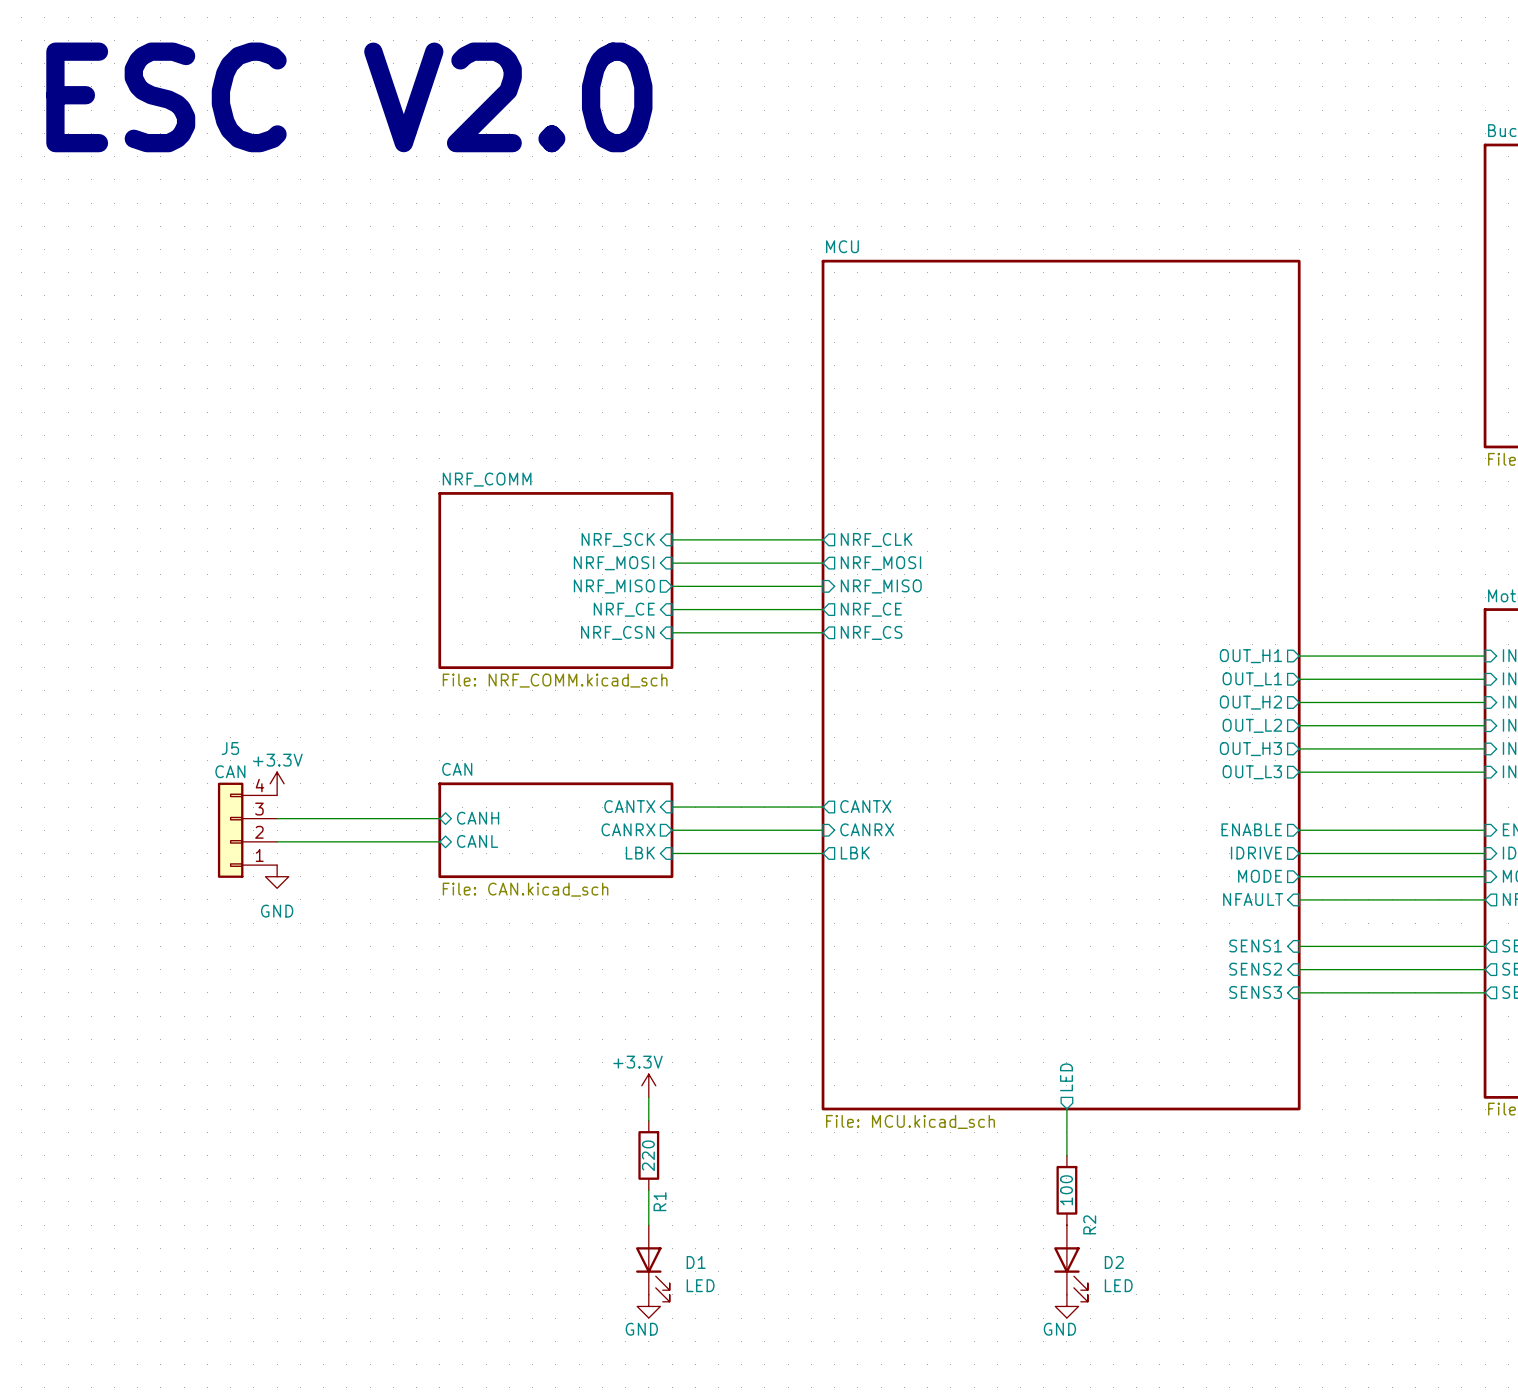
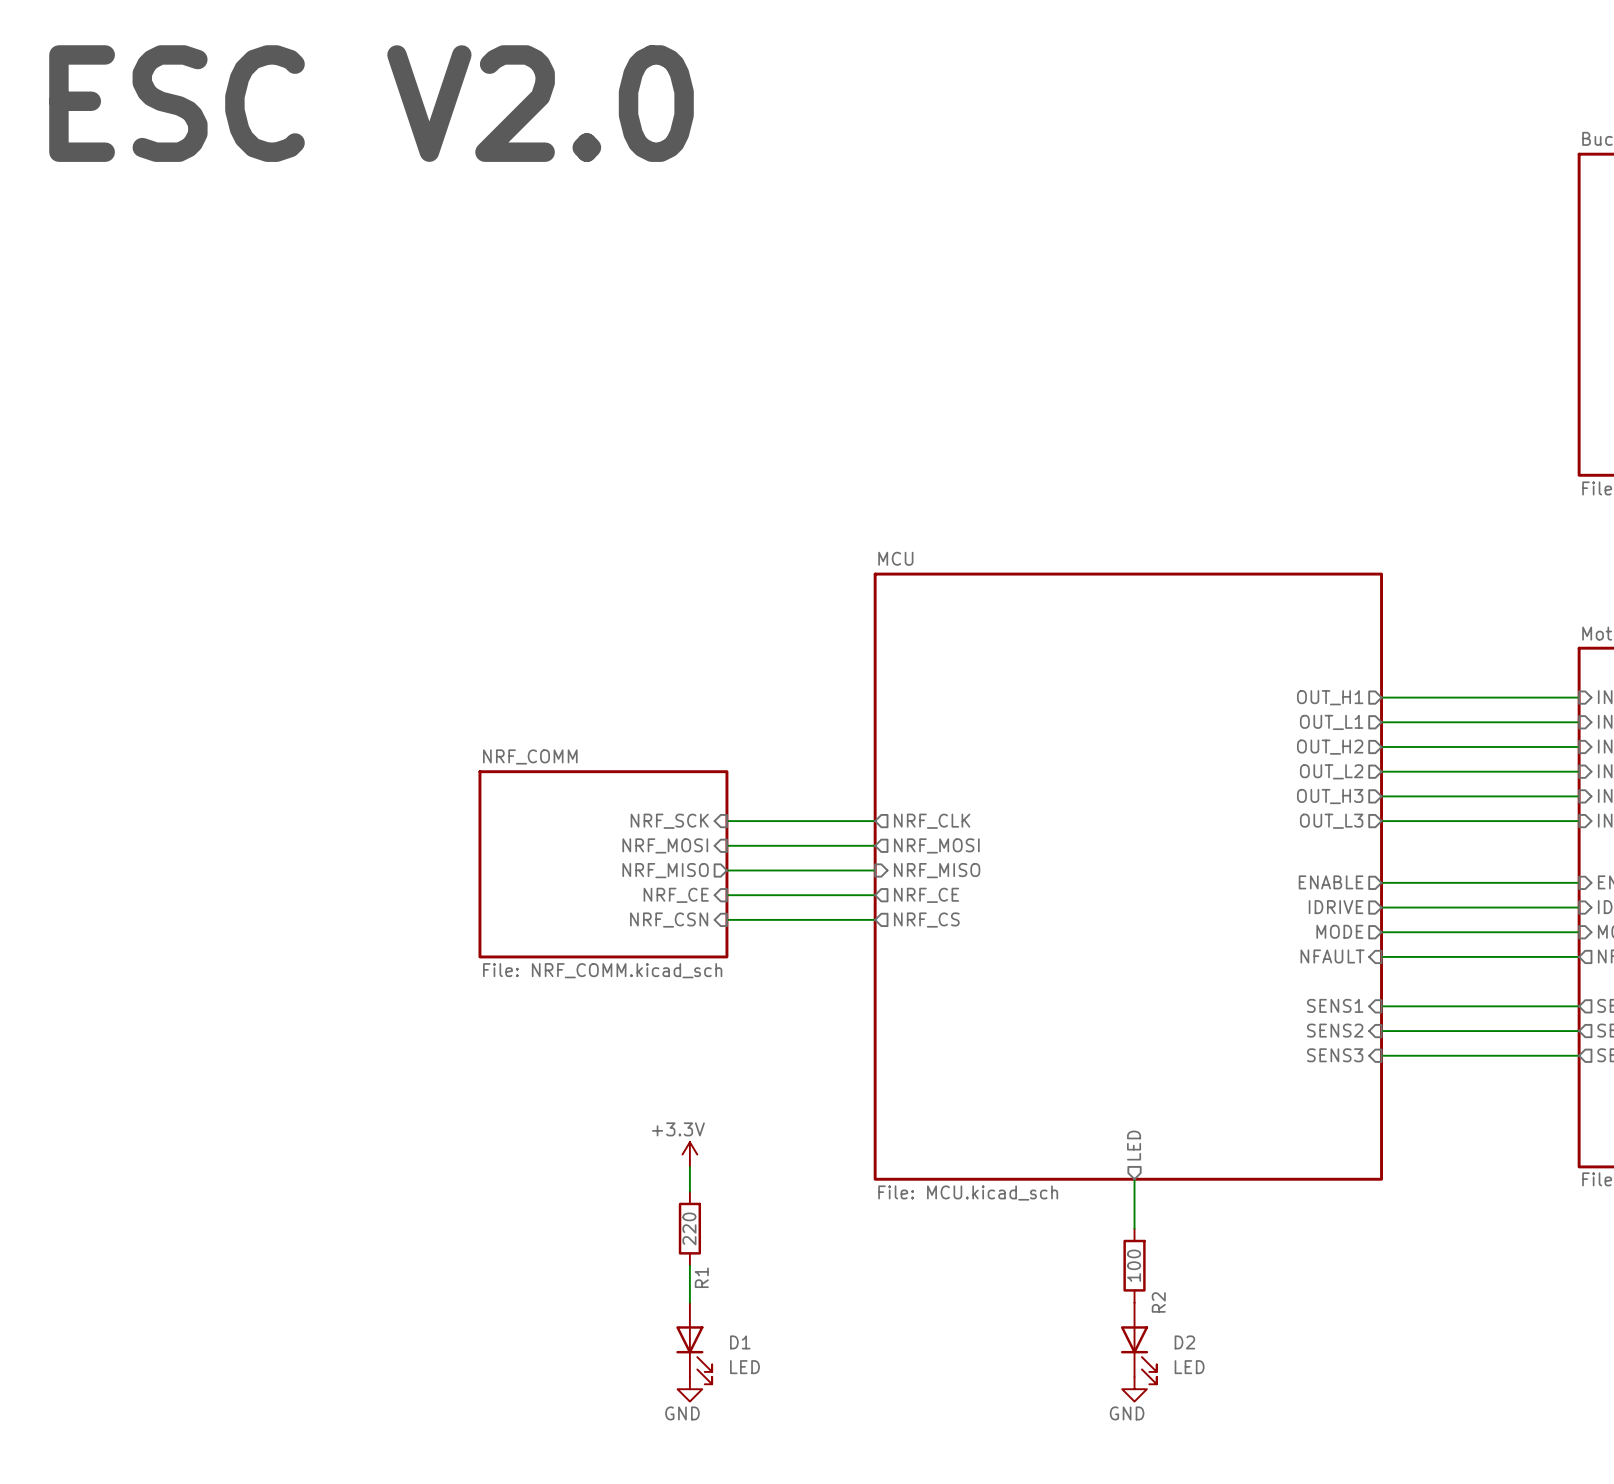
wire: (672, 539) (823, 539) -> none
sheet pin: NRF_SCK (618, 540) -> none
sheet pin: NRF_CLK (876, 540) -> none
sheet pin: NRF_MOSI (614, 563) -> none
wire: (672, 563) (823, 563) -> none
sheet pin: NRF_MOSI (881, 563) -> none
sheet NRF_COMM: File: NRF_COMM.kicad_sch (555, 580) -> none
sheet pin: NRF_MISO (614, 586) -> none
wire: (672, 586) (823, 586) -> none
sheet pin: NRF_MISO (881, 586) -> none
sheet pin: NRF_CE (624, 609) -> none
wire: (672, 609) (823, 609) -> none
sheet pin: NRF_CE (871, 609) -> none
sheet pin: NRF_CSN (617, 632) -> none
wire: (672, 632) (823, 632) -> none
sheet pin: NRF_CS (871, 632) -> none
sheet MCU: File: MCU.kicad_sch (1061, 685) -> none
sheet pin: none -> NRF_SCK (669, 821)
wire: none -> (726, 821) (875, 821)
sheet pin: none -> NRF_CLK (932, 821)
power symbol: +3.3V (277, 783) -> none
sheet pin: none -> NRF_MOSI (665, 845)
wire: none -> (726, 845) (875, 845)
sheet pin: none -> NRF_MOSI (936, 845)
sheet pin: CANTX (629, 806) -> none
sheet pin: CANTX (865, 806) -> none
wire: (672, 807) (823, 807) -> none
sheet NRF_COMM: none -> File: NRF_COMM.kicad_sch (603, 864)
wire: (277, 818) (439, 818) -> none
sheet pin: CANH (478, 818) -> none
sheet pin: none -> NRF_MISO (665, 870)
wire: none -> (726, 870) (875, 870)
sheet pin: none -> NRF_MISO (937, 870)
sheet MCU: none -> File: MCU.kicad_sch (1128, 876)
sheet pin: CANRX (628, 829) -> none
sheet pin: CANRX (867, 829) -> none
J5: CAN (247, 830) -> none
sheet CAN: File: CAN.kicad_sch (555, 830) -> none
wire: (672, 830) (823, 830) -> none
wire: (277, 841) (439, 841) -> none
sheet pin: CANL (477, 841) -> none
sheet pin: none -> NRF_CE (676, 895)
wire: none -> (726, 895) (875, 895)
sheet pin: none -> NRF_CE (926, 895)
sheet pin: LBK (640, 853) -> none
wire: (672, 853) (823, 853) -> none
sheet pin: LBK (855, 853) -> none
sheet pin: none -> NRF_CSN (669, 920)
wire: none -> (726, 919) (875, 919)
sheet pin: none -> NRF_CS (926, 920)
power symbol: GND (277, 876) -> none

